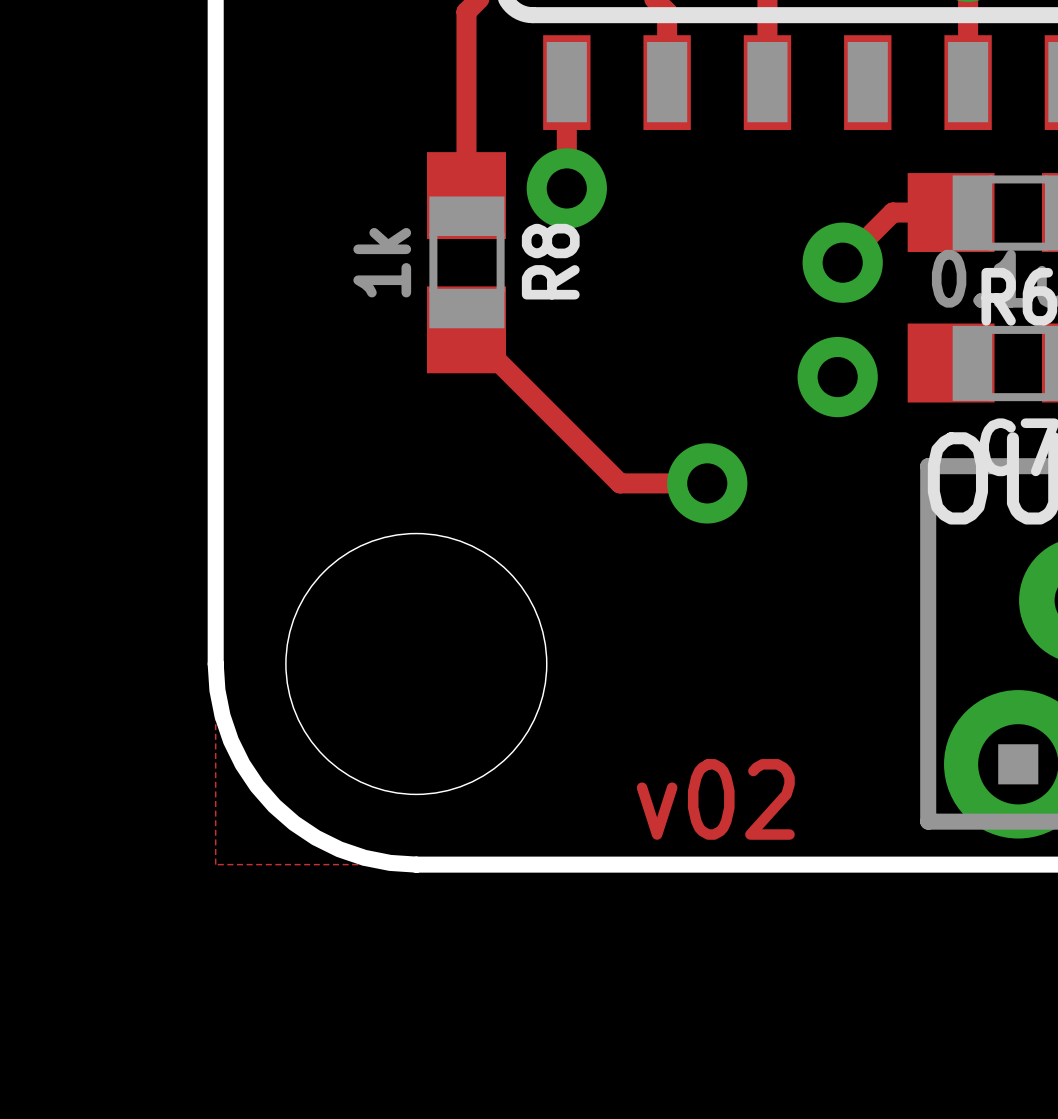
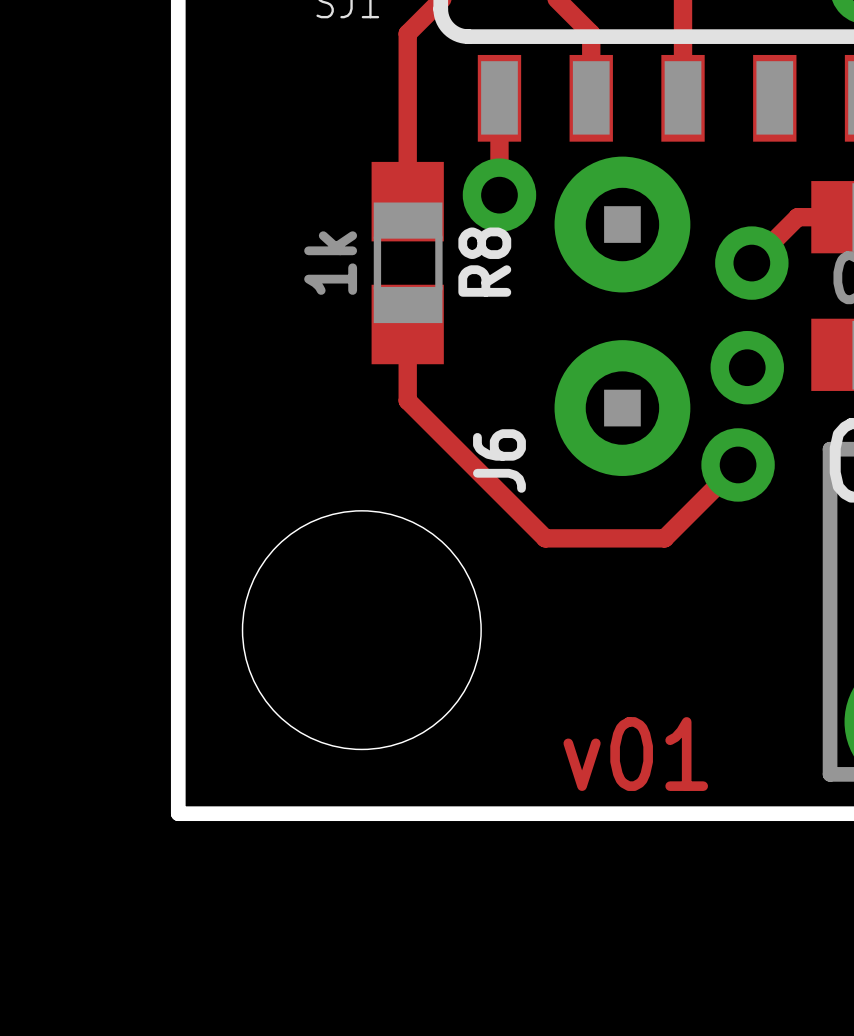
J6: none -> (622, 316)
track: (466, 329) (620, 483) (707, 483) -> (407, 324) (407, 400) (545, 538) (664, 538) (738, 464)
via position: (707, 483) -> (738, 464)
board edge: (215, 663) (217, 690) (222, 715) (230, 740) (242, 764) (257, 786) (274, 805) (294, 823) (316, 837) (339, 849) (364, 857) (390, 862) (416, 864) -> (178, 630) (178, 813) (361, 813)
text: v02 (715, 799) -> v01 (635, 754)

